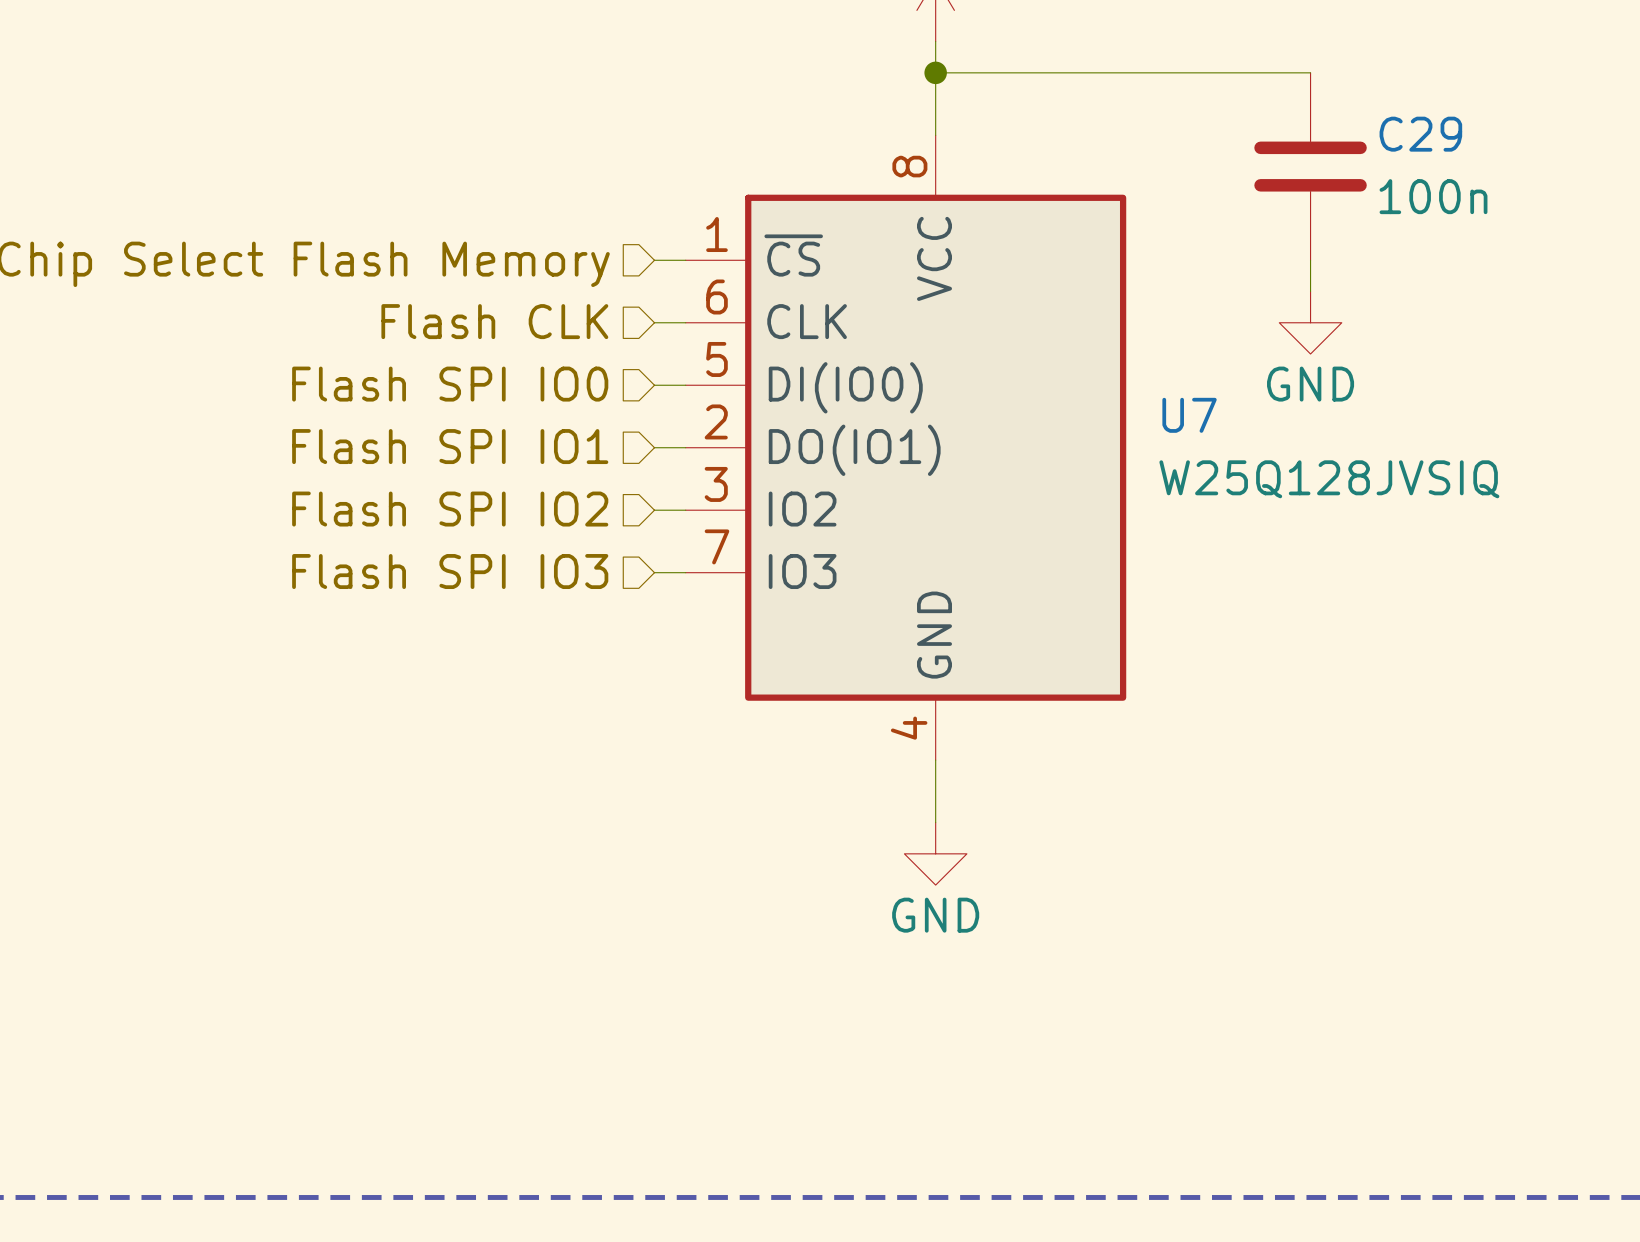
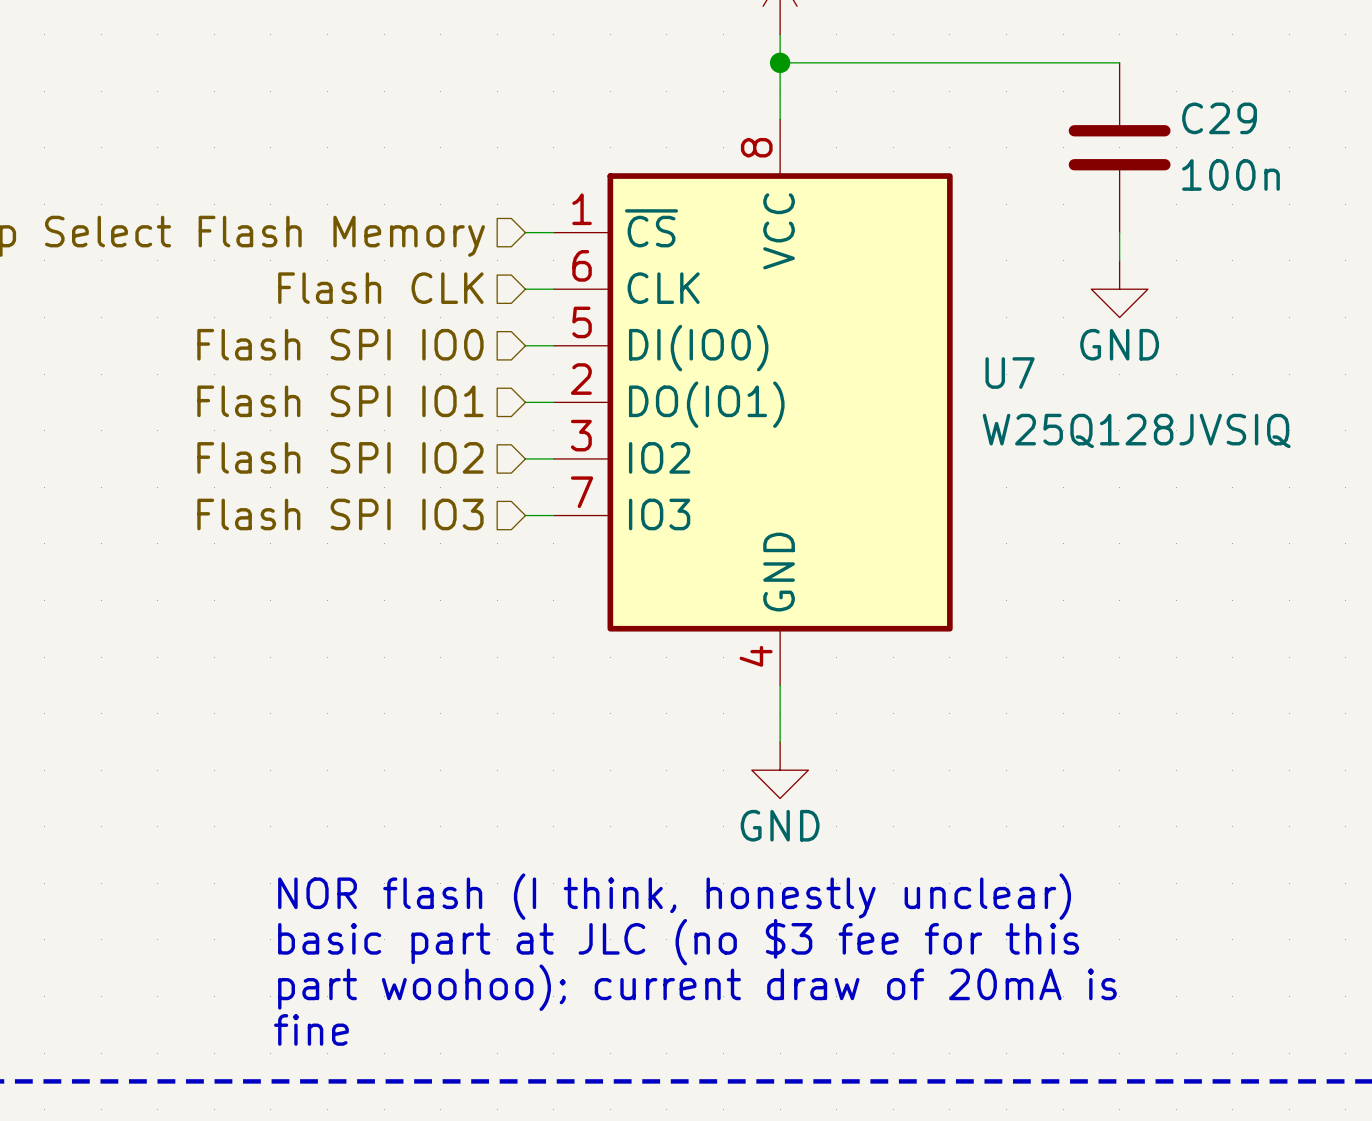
text: none -> NOR flash (I think, honestly unclear) (674, 896)
text: none -> basic part at JLC (no $3 fee for this (678, 942)
text: none -> part woohoo); current draw of 20mA is (697, 987)
text: none -> fine (311, 1029)

